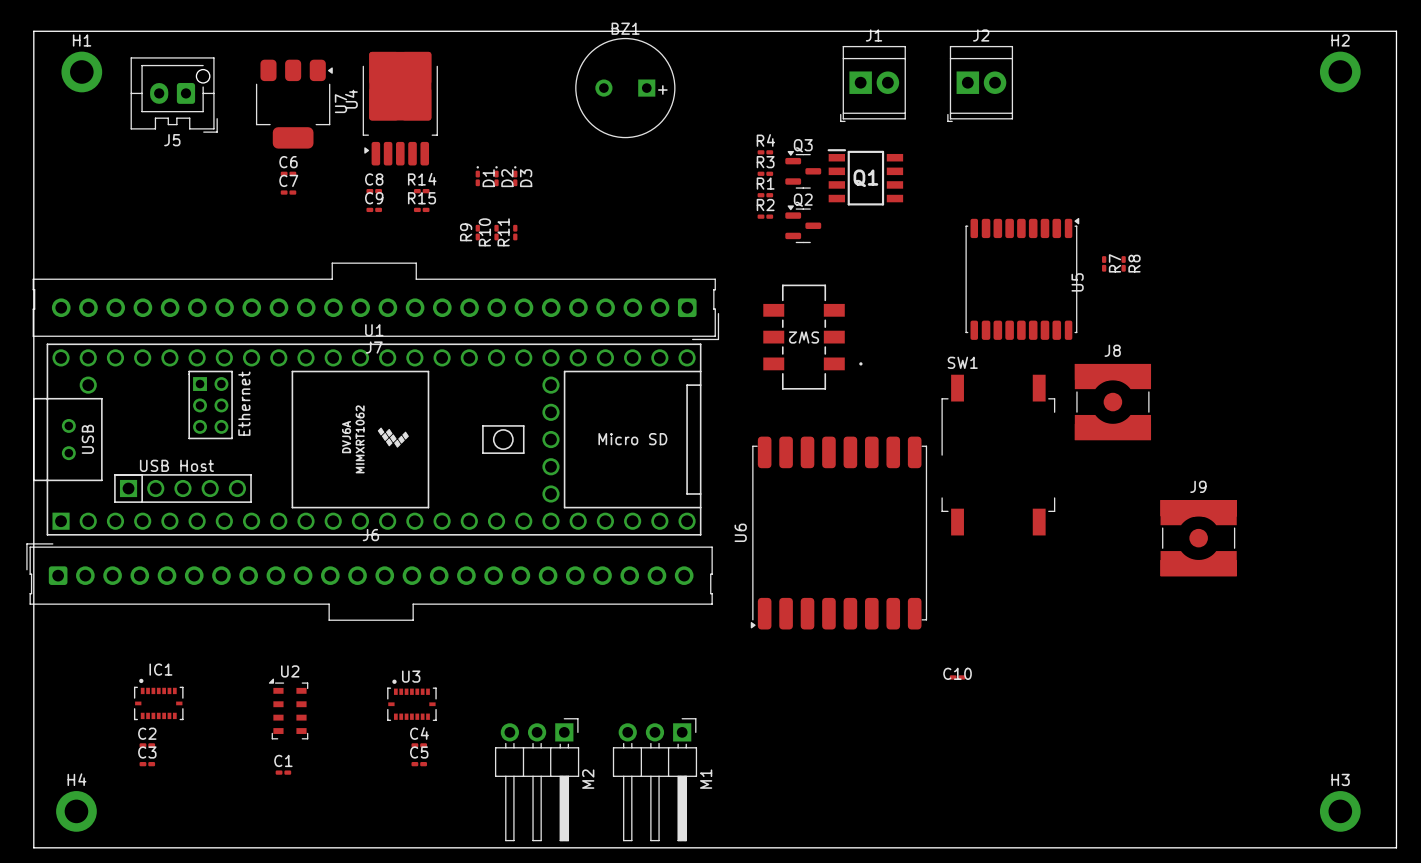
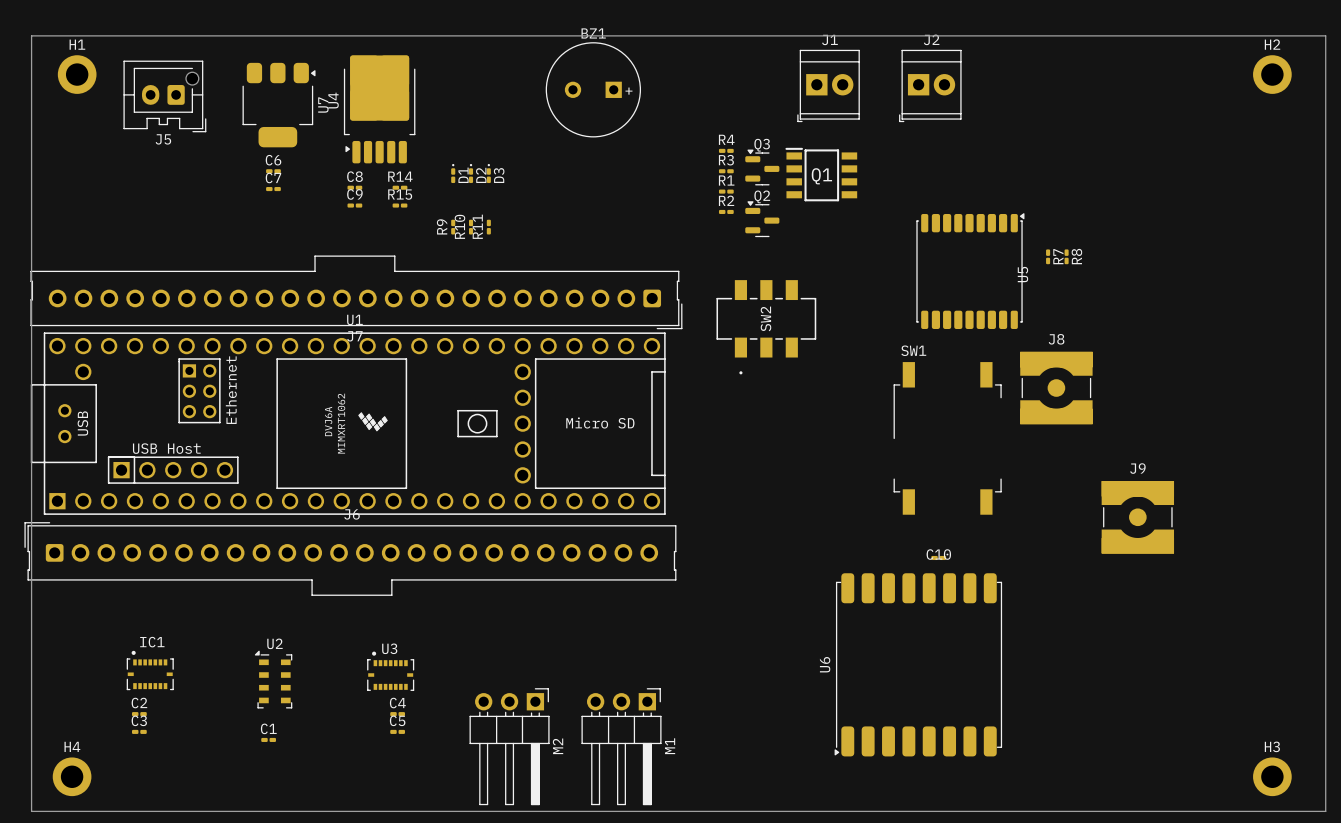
SW2 rotation: 0° (812, 337) -> 90° clockwise (766, 327)
U6 position: (838, 533) -> (918, 664)
C10 position: (957, 677) -> (938, 557)

